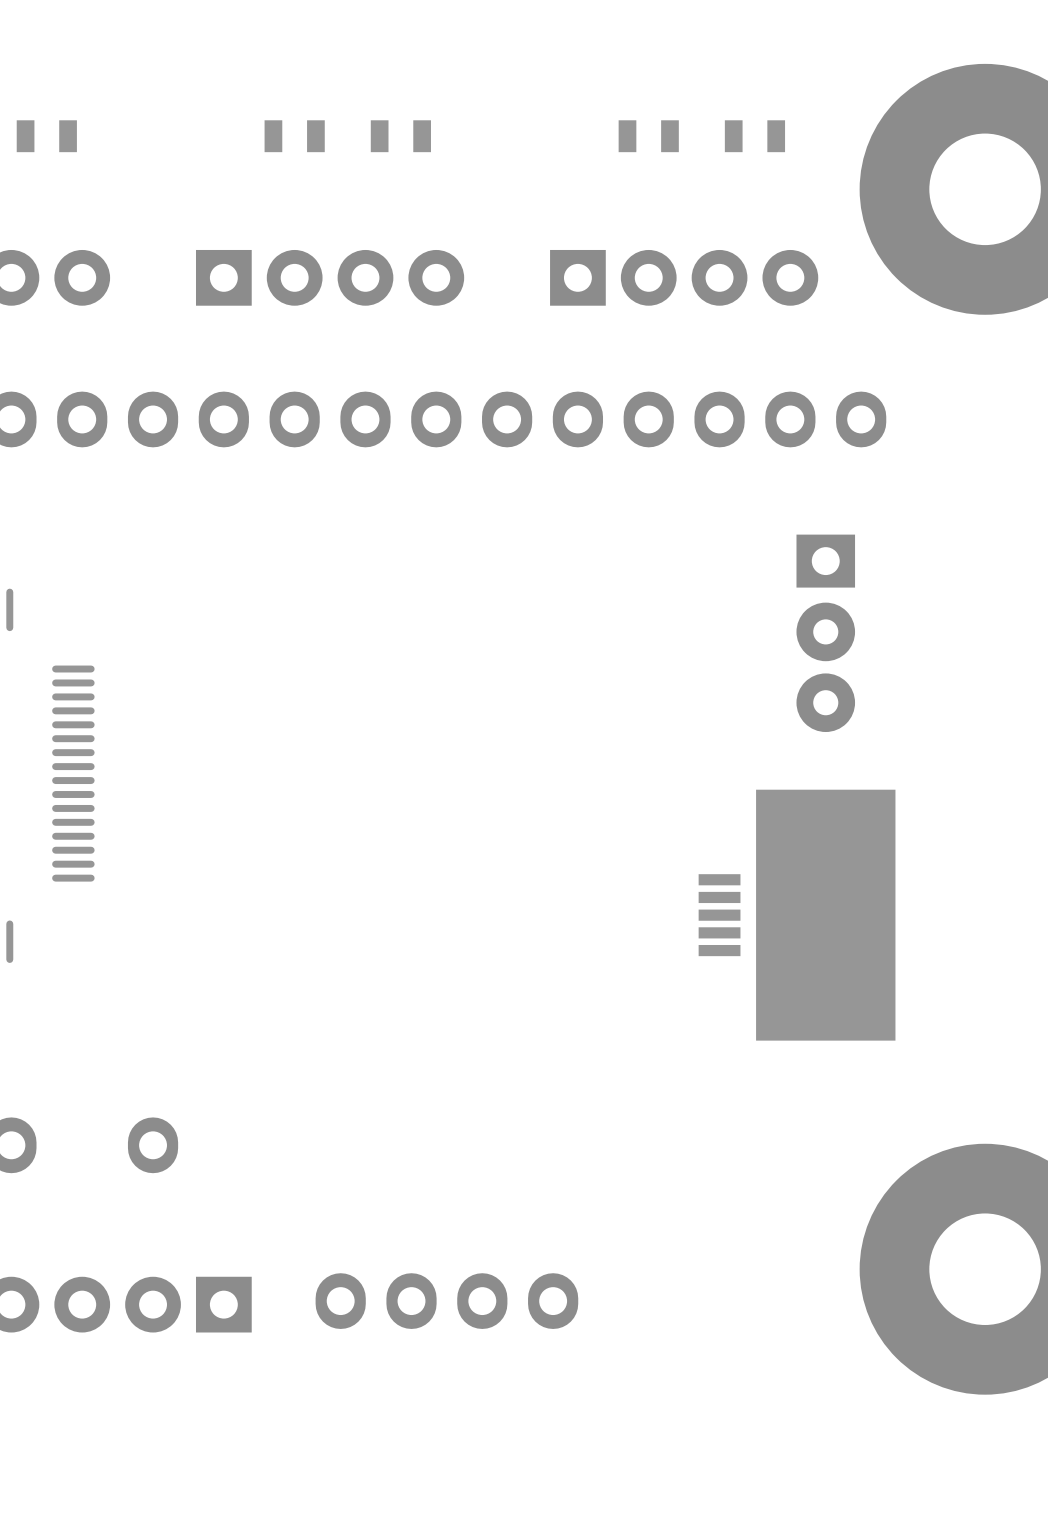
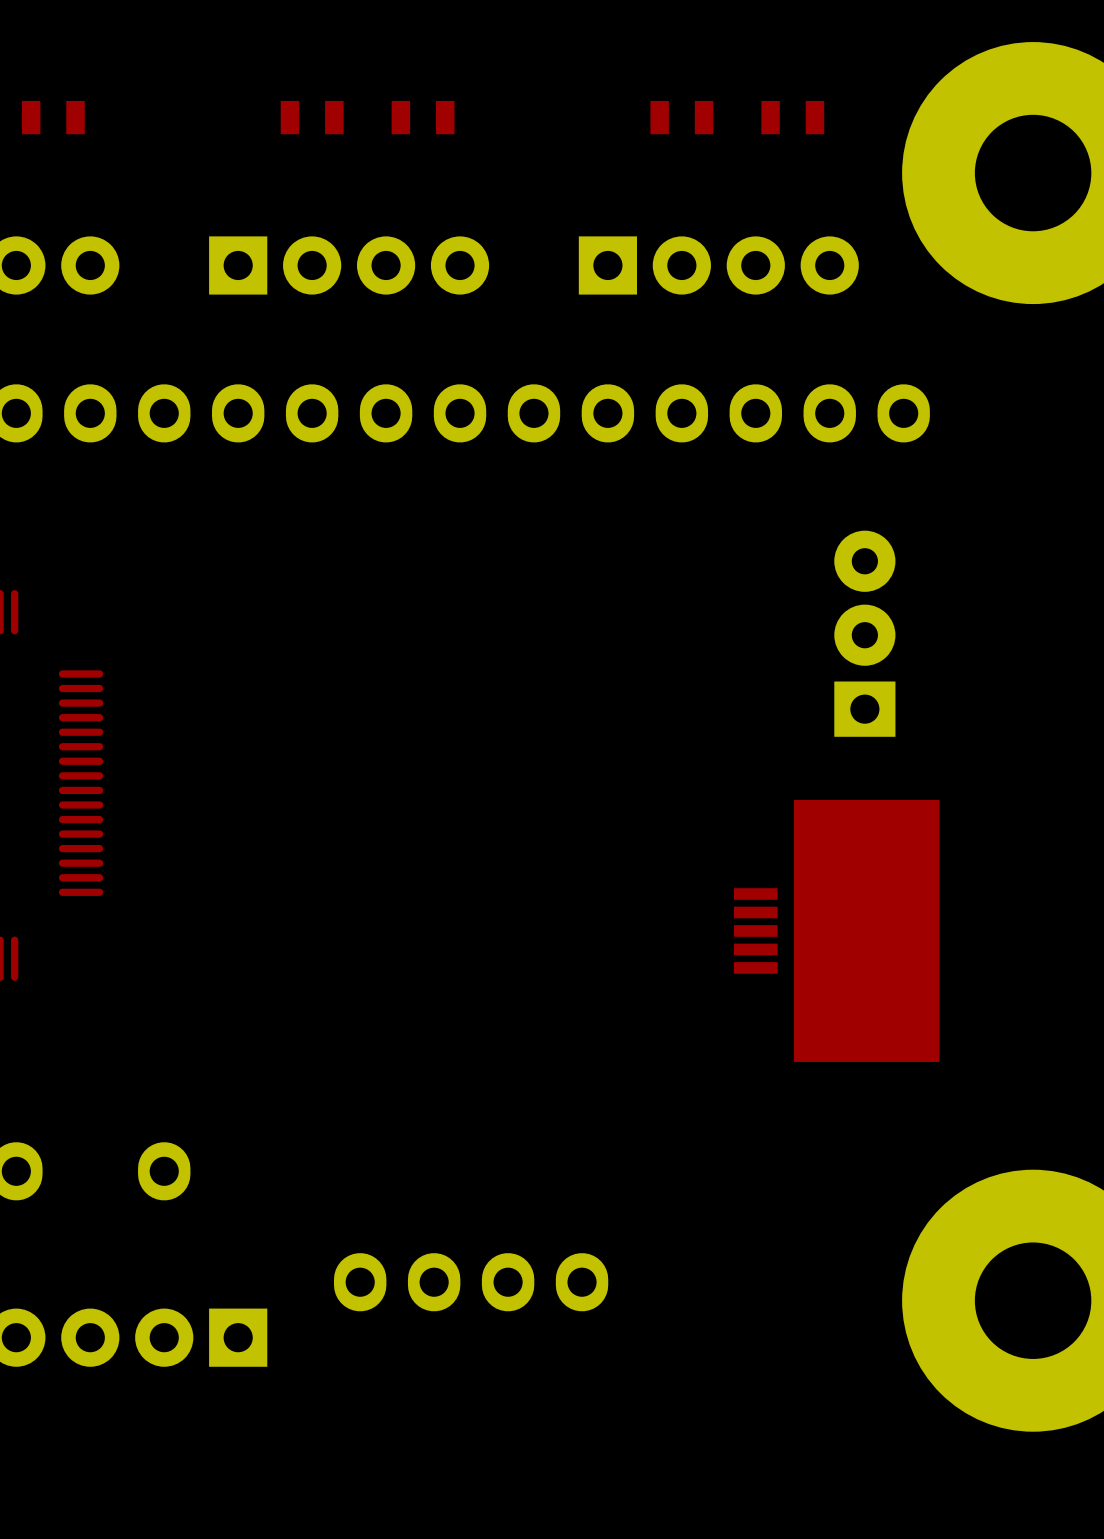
part rotation: 0° (825, 633) -> 180° (864, 633)
part: none -> (360, 1282)
part: none -> (434, 1282)
part: none -> (508, 1282)
part: none -> (582, 1282)
part: (340, 1301) -> none
part: (411, 1301) -> none
part: (482, 1301) -> none
part: (553, 1301) -> none

